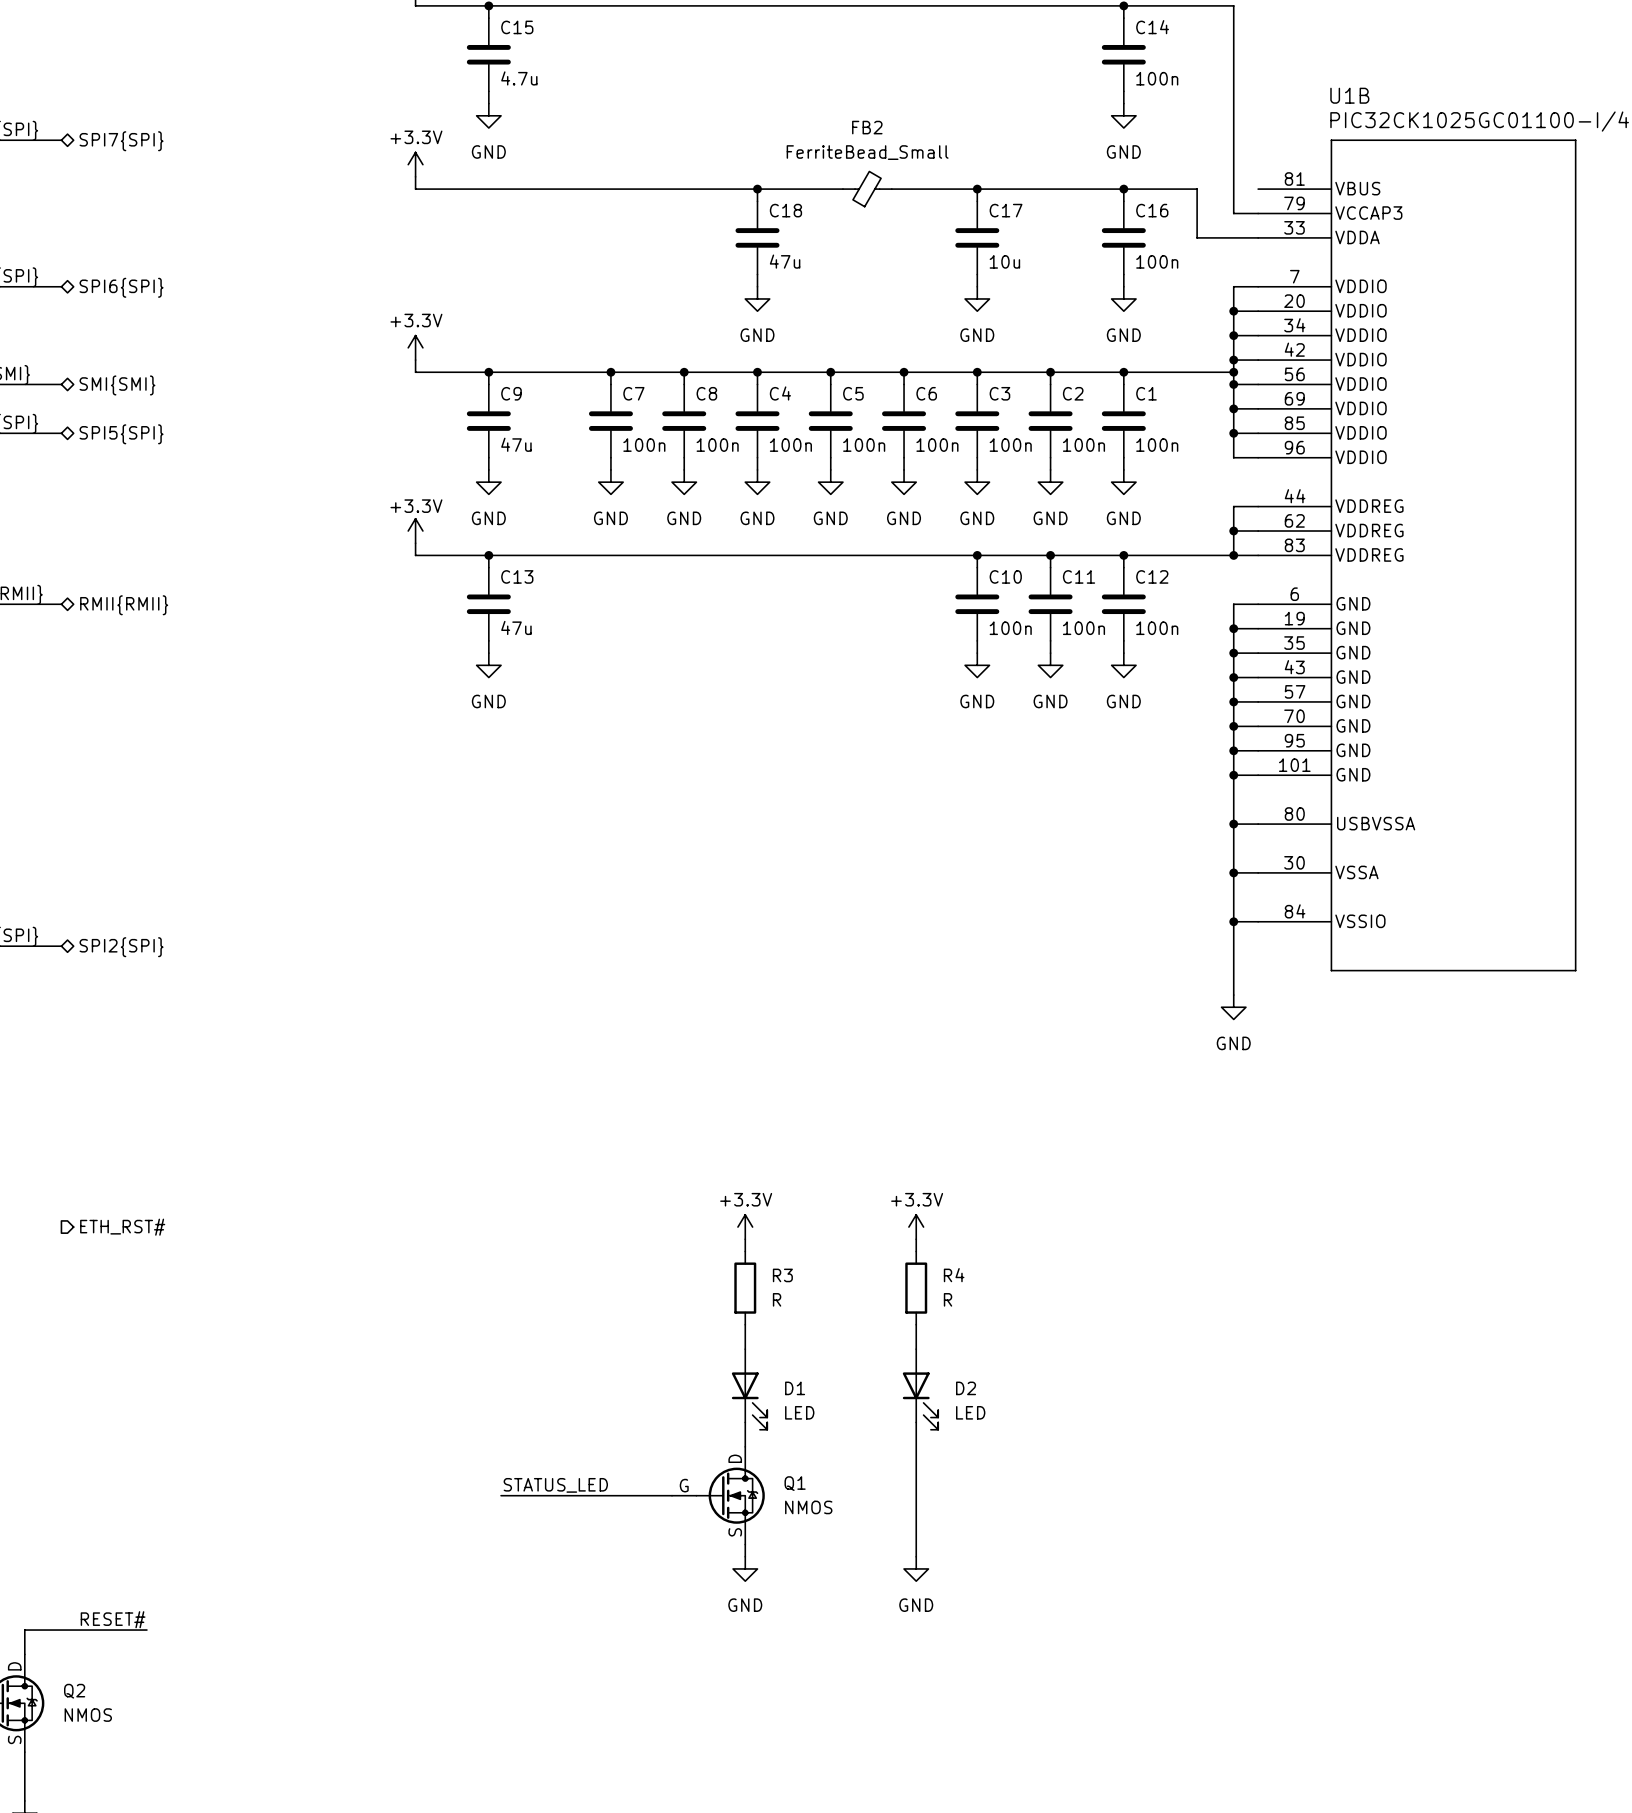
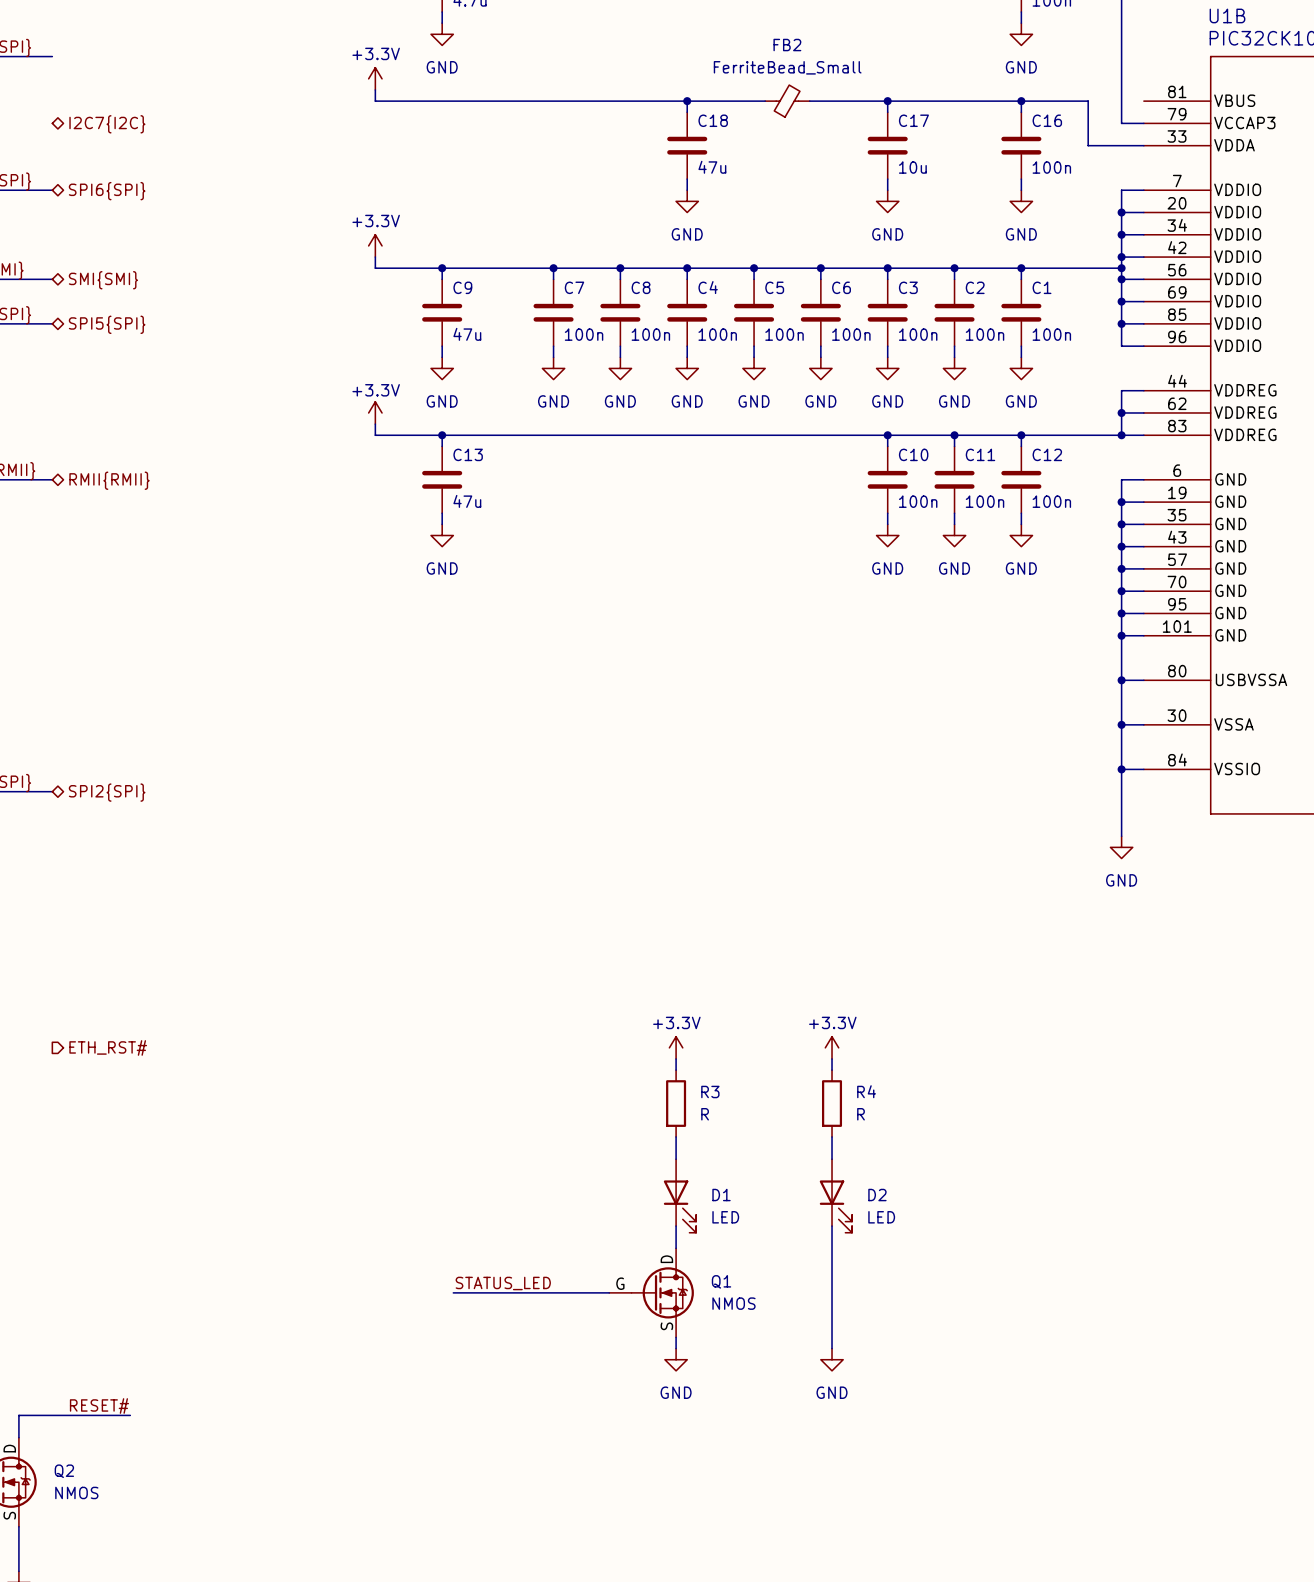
hierarchical label: SPI7{SPI} (121, 141) -> none
hierarchical label: none -> I2C7{I2C} (107, 124)

